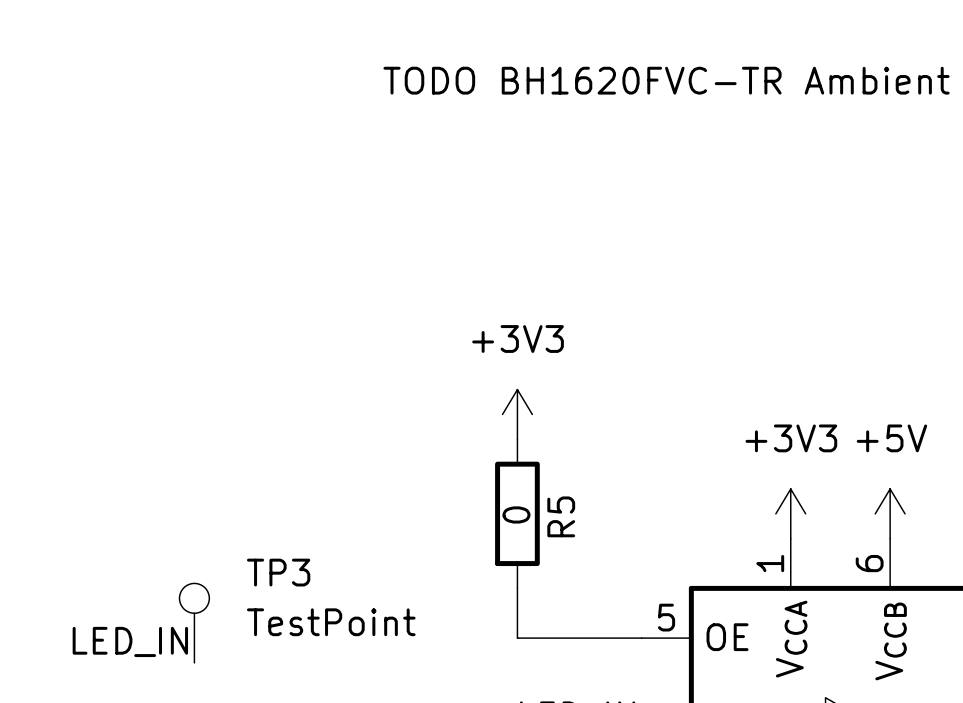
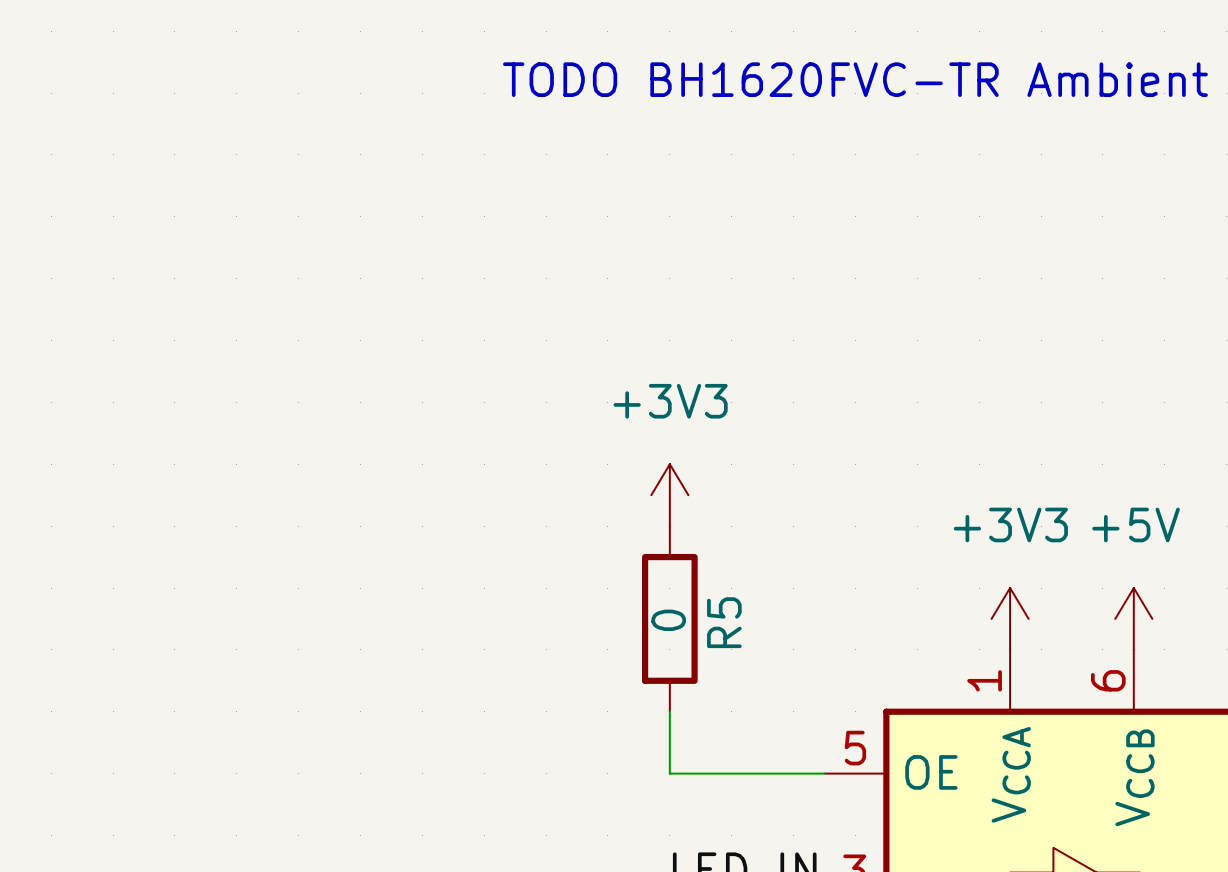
TP3: TestPoint (194, 623) -> none
label: LED_IN (130, 641) -> none

